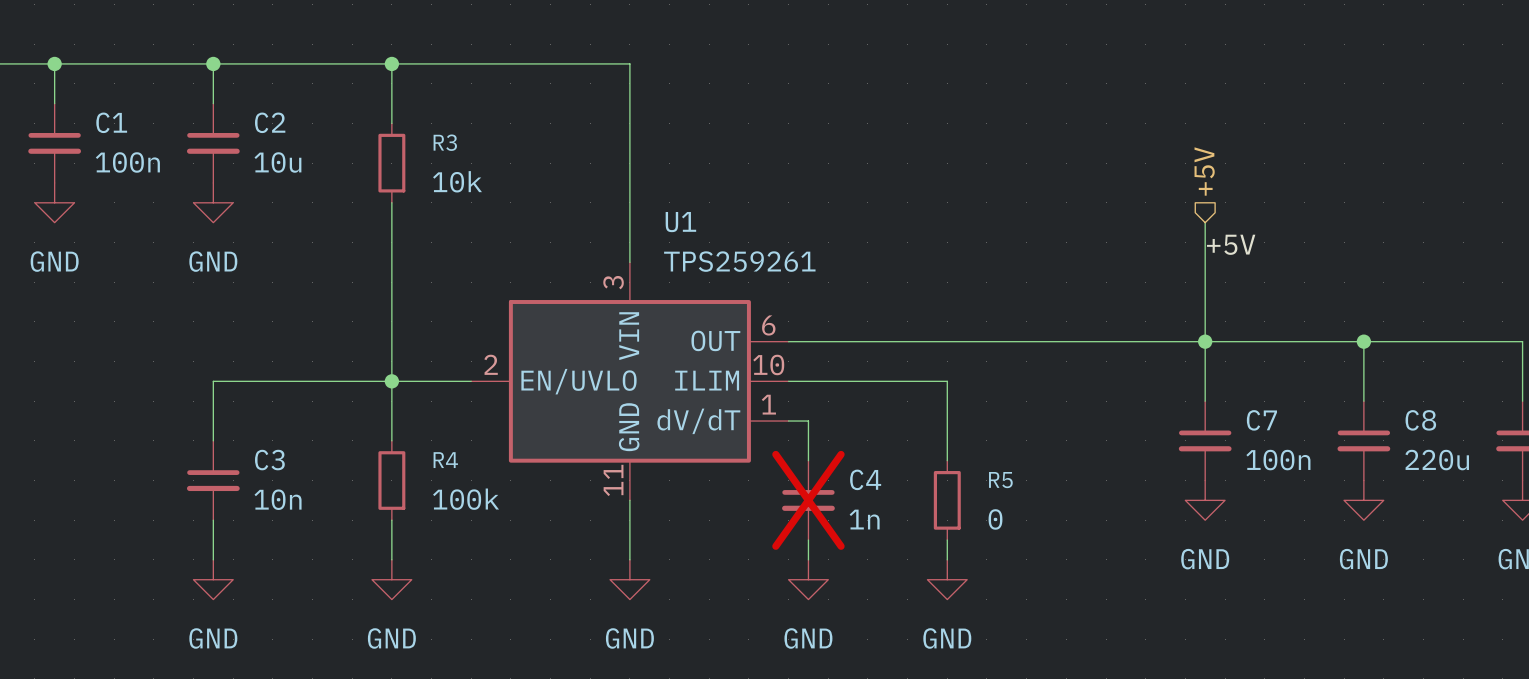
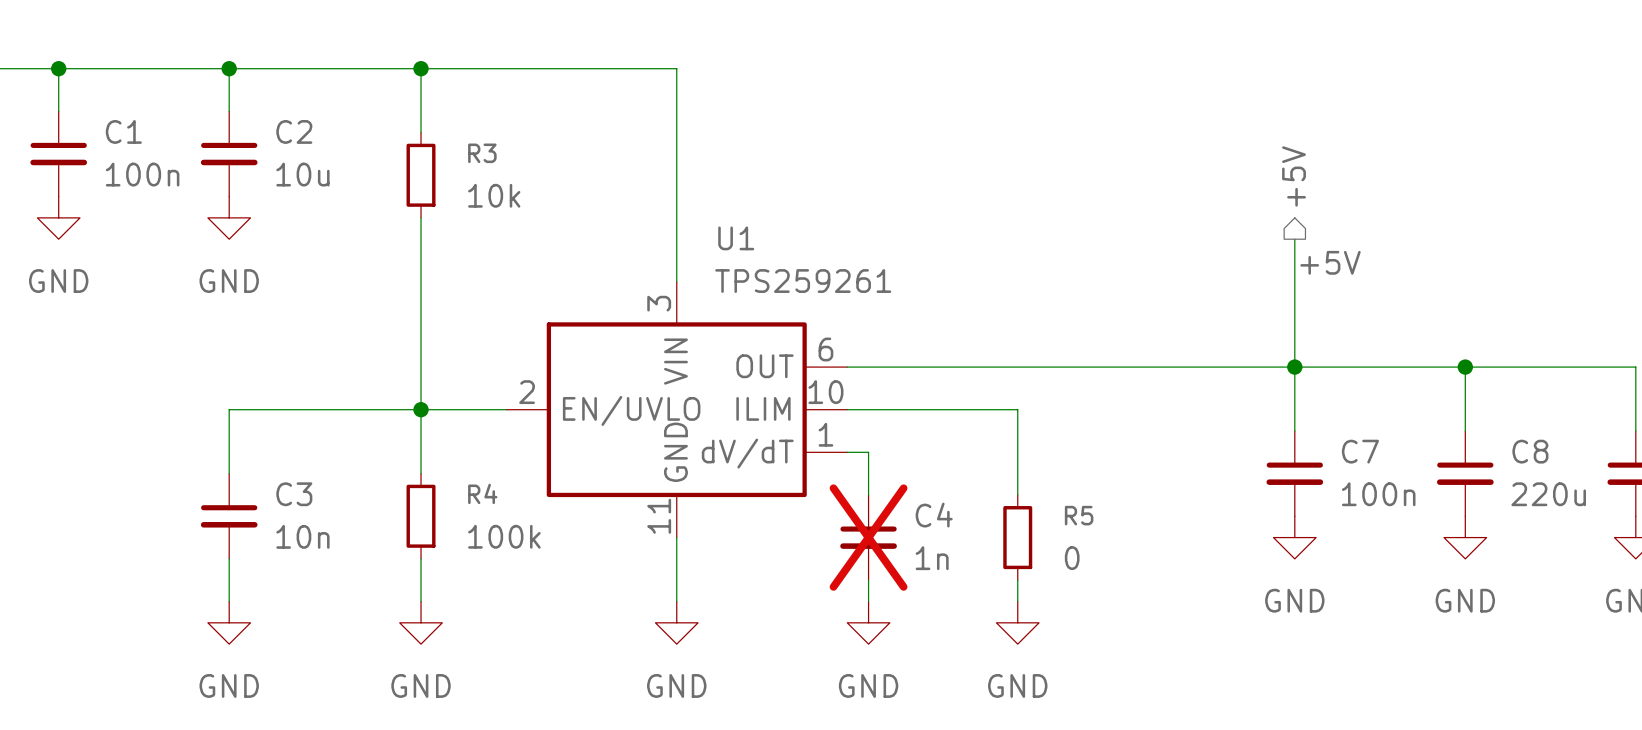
hierarchical label shape: input (1204, 171) -> output (1294, 176)

